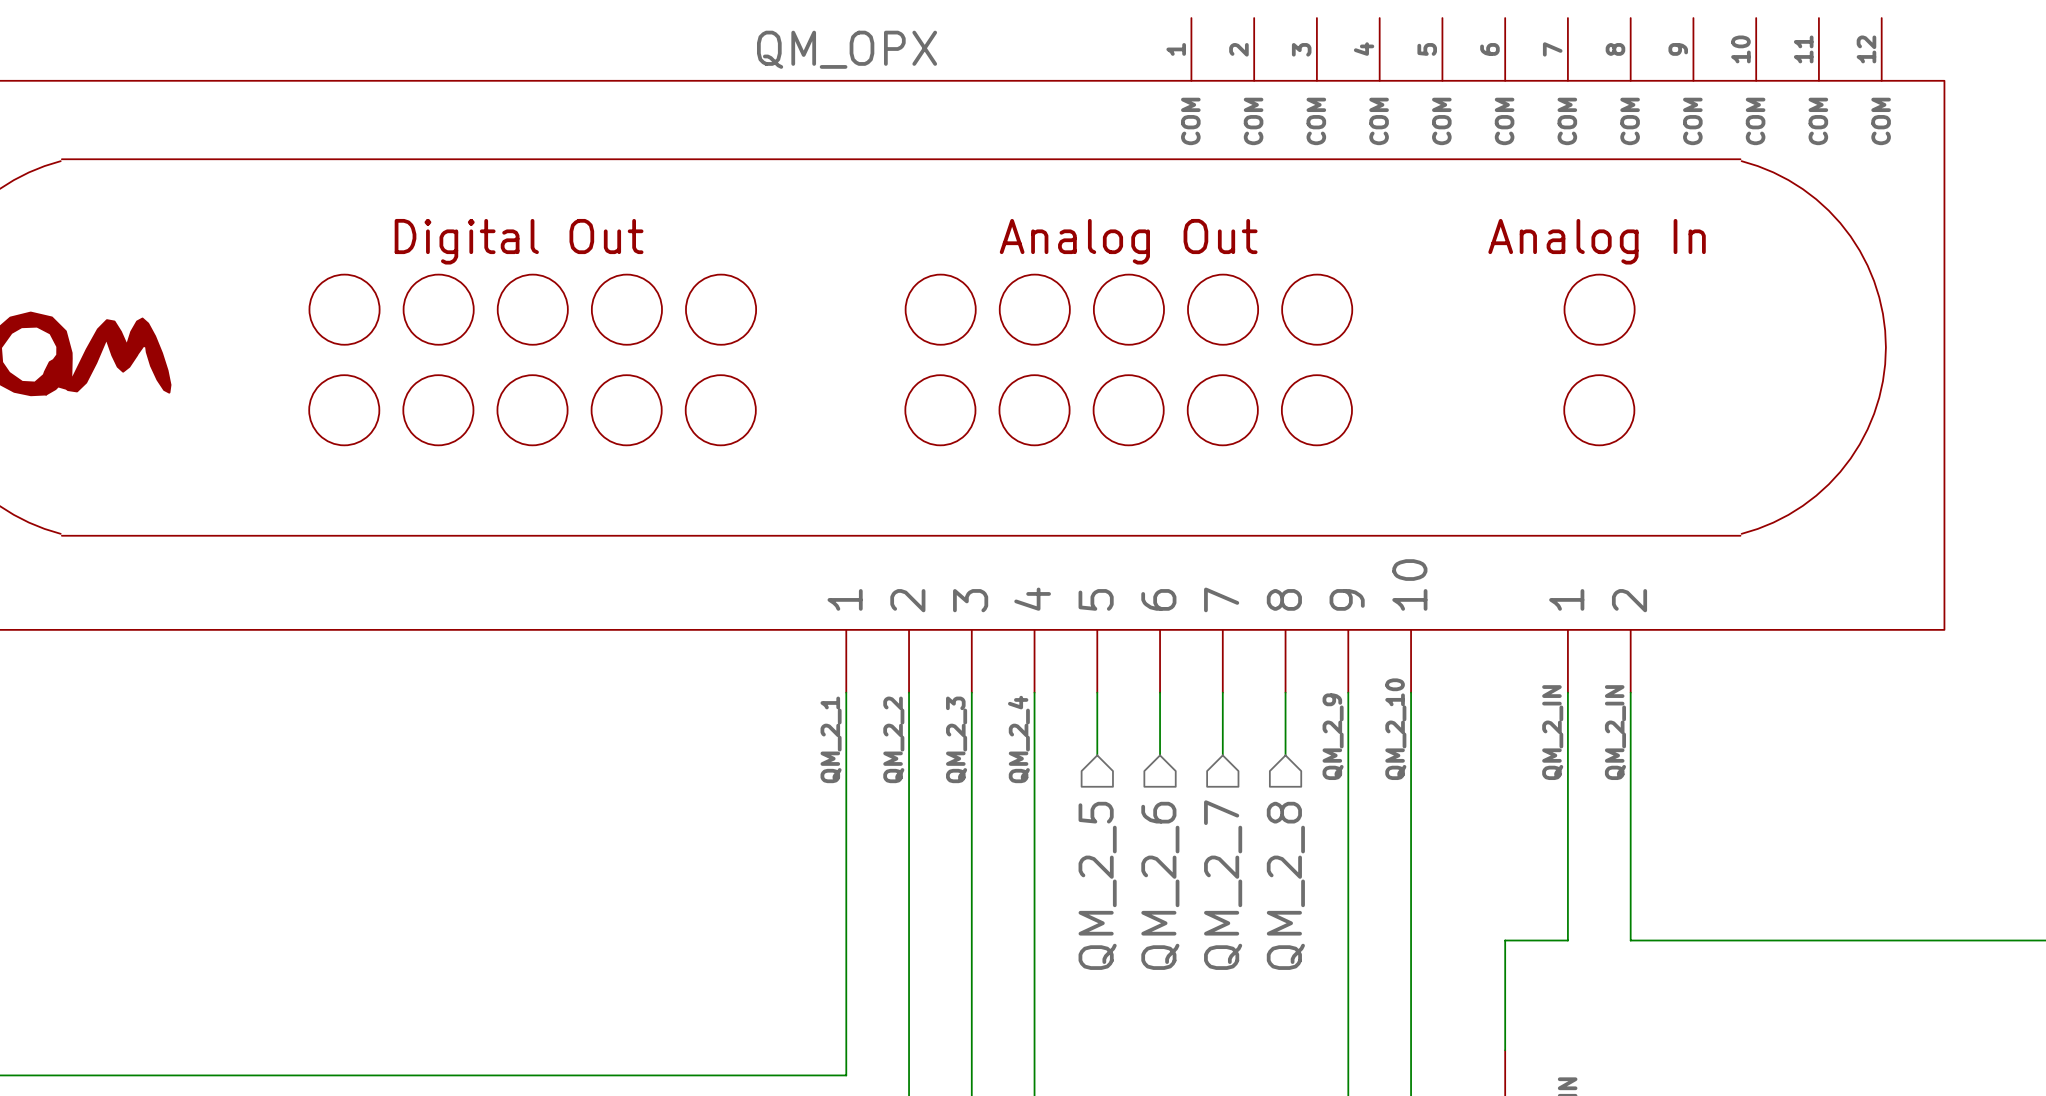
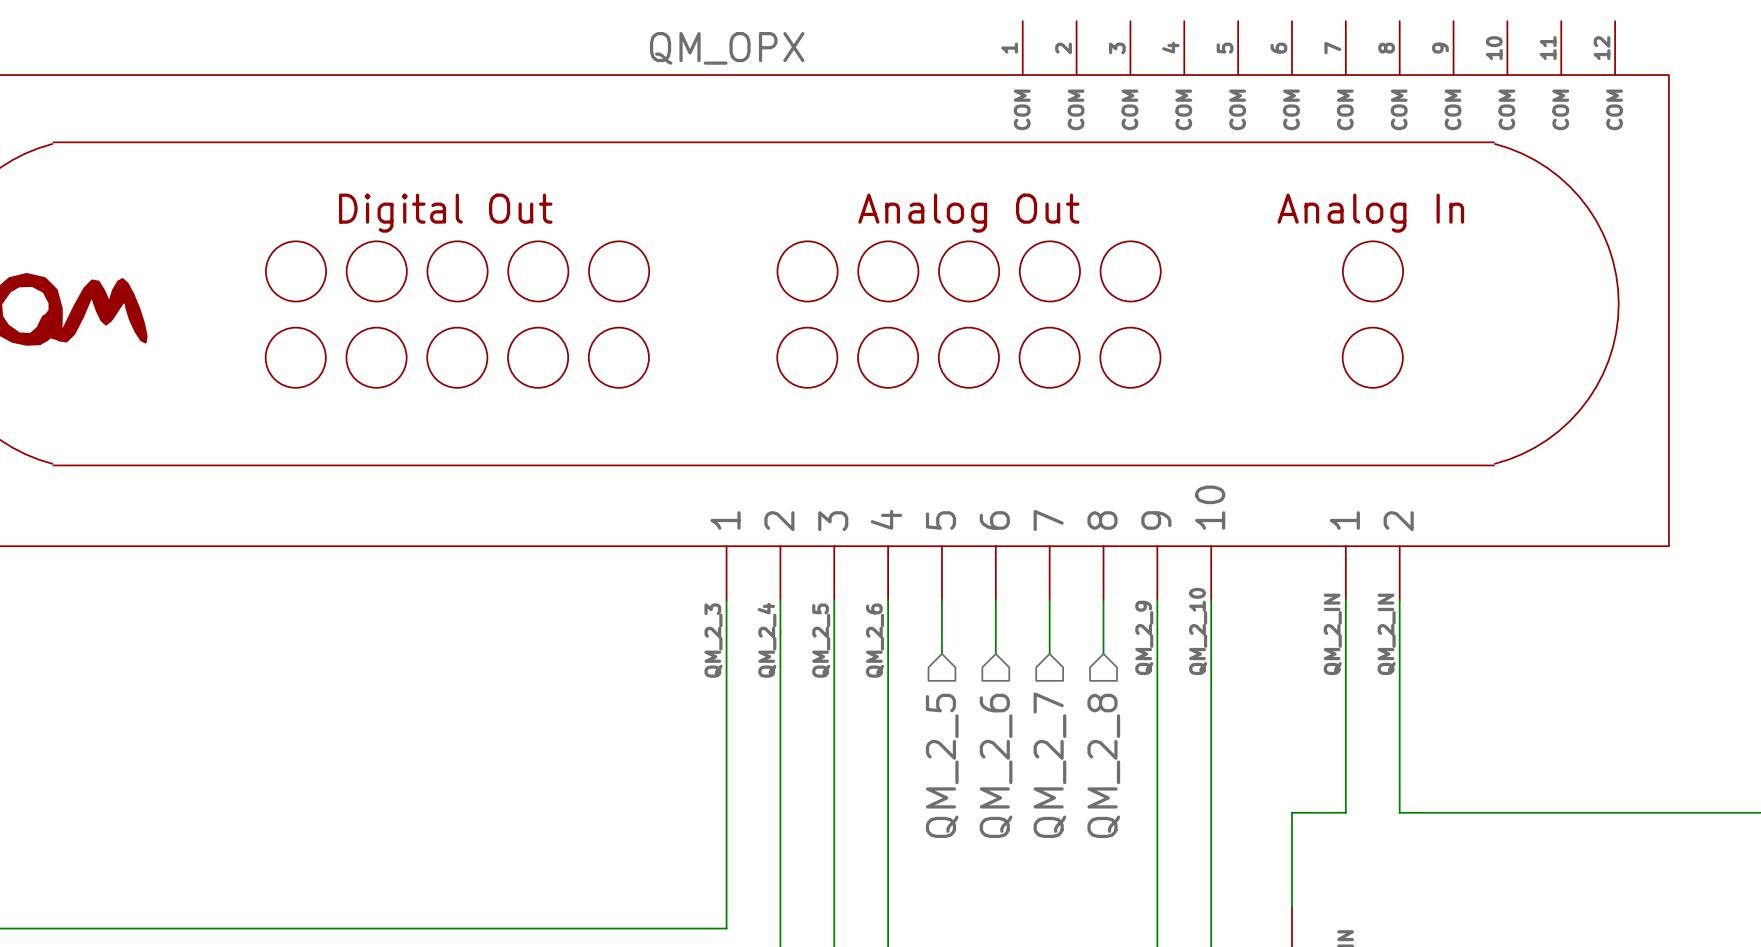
label: QM_2_1 (831, 739) -> QM_2_3 (713, 640)
label: QM_2_2 (893, 739) -> QM_2_4 (767, 640)
label: QM_2_3 (956, 739) -> QM_2_5 (821, 640)
label: QM_2_4 (1018, 739) -> QM_2_6 (875, 640)

